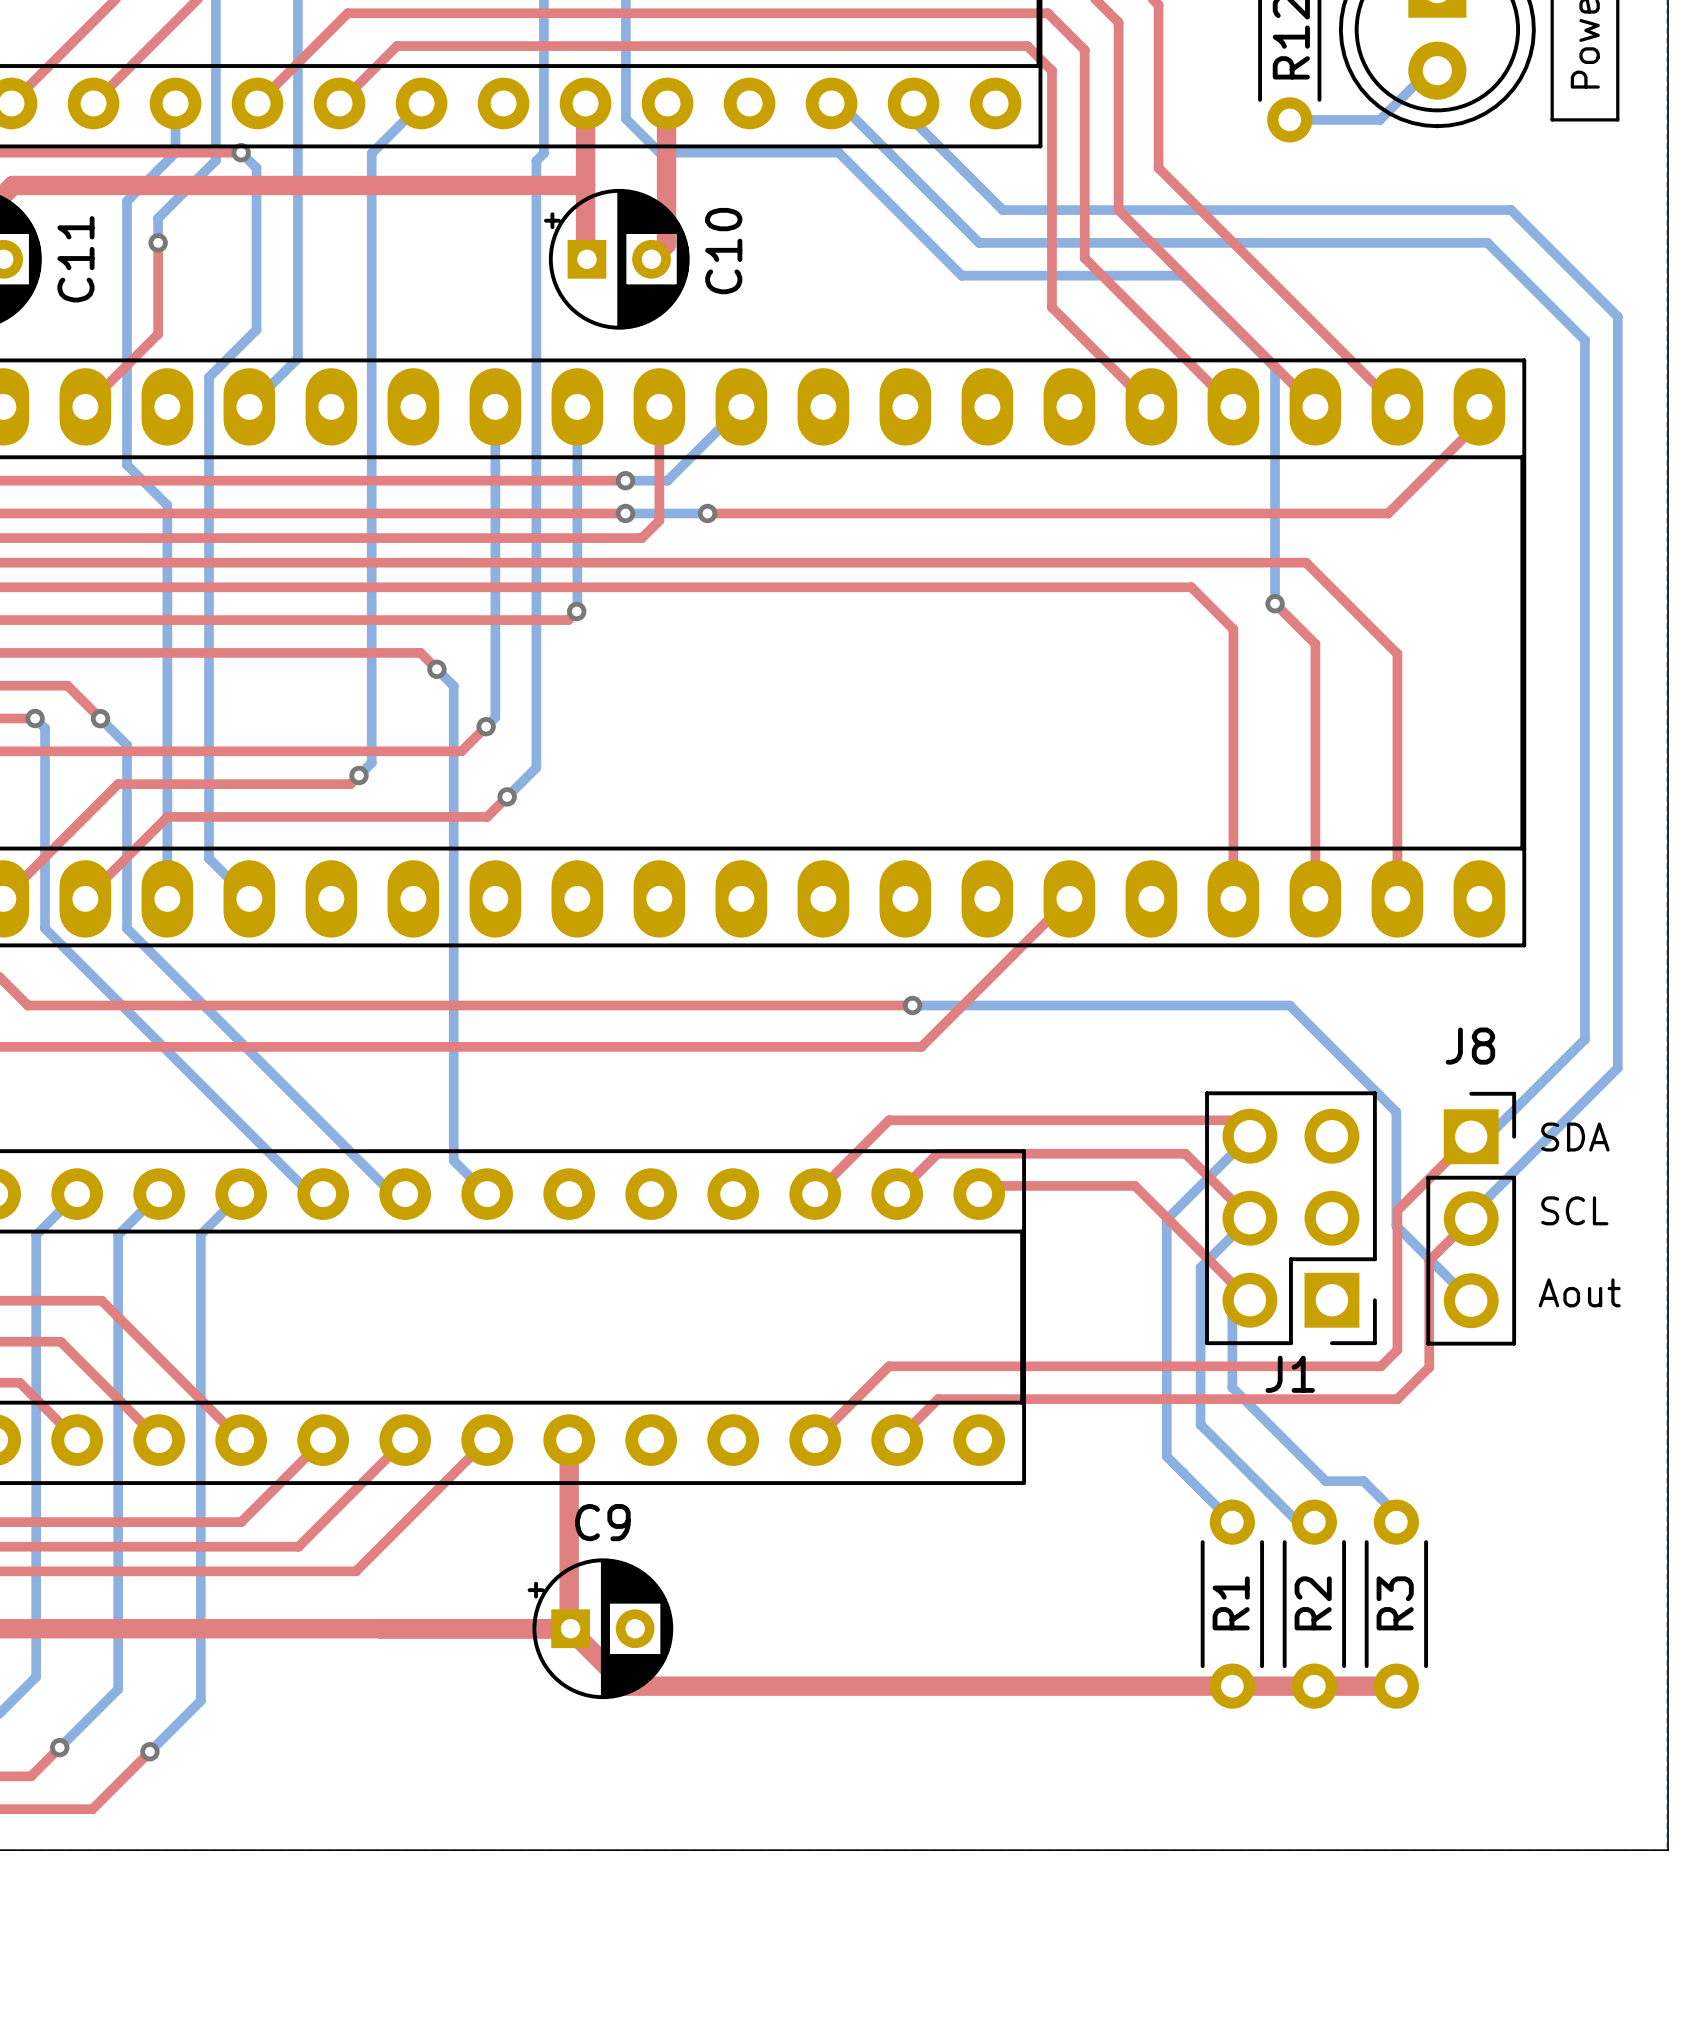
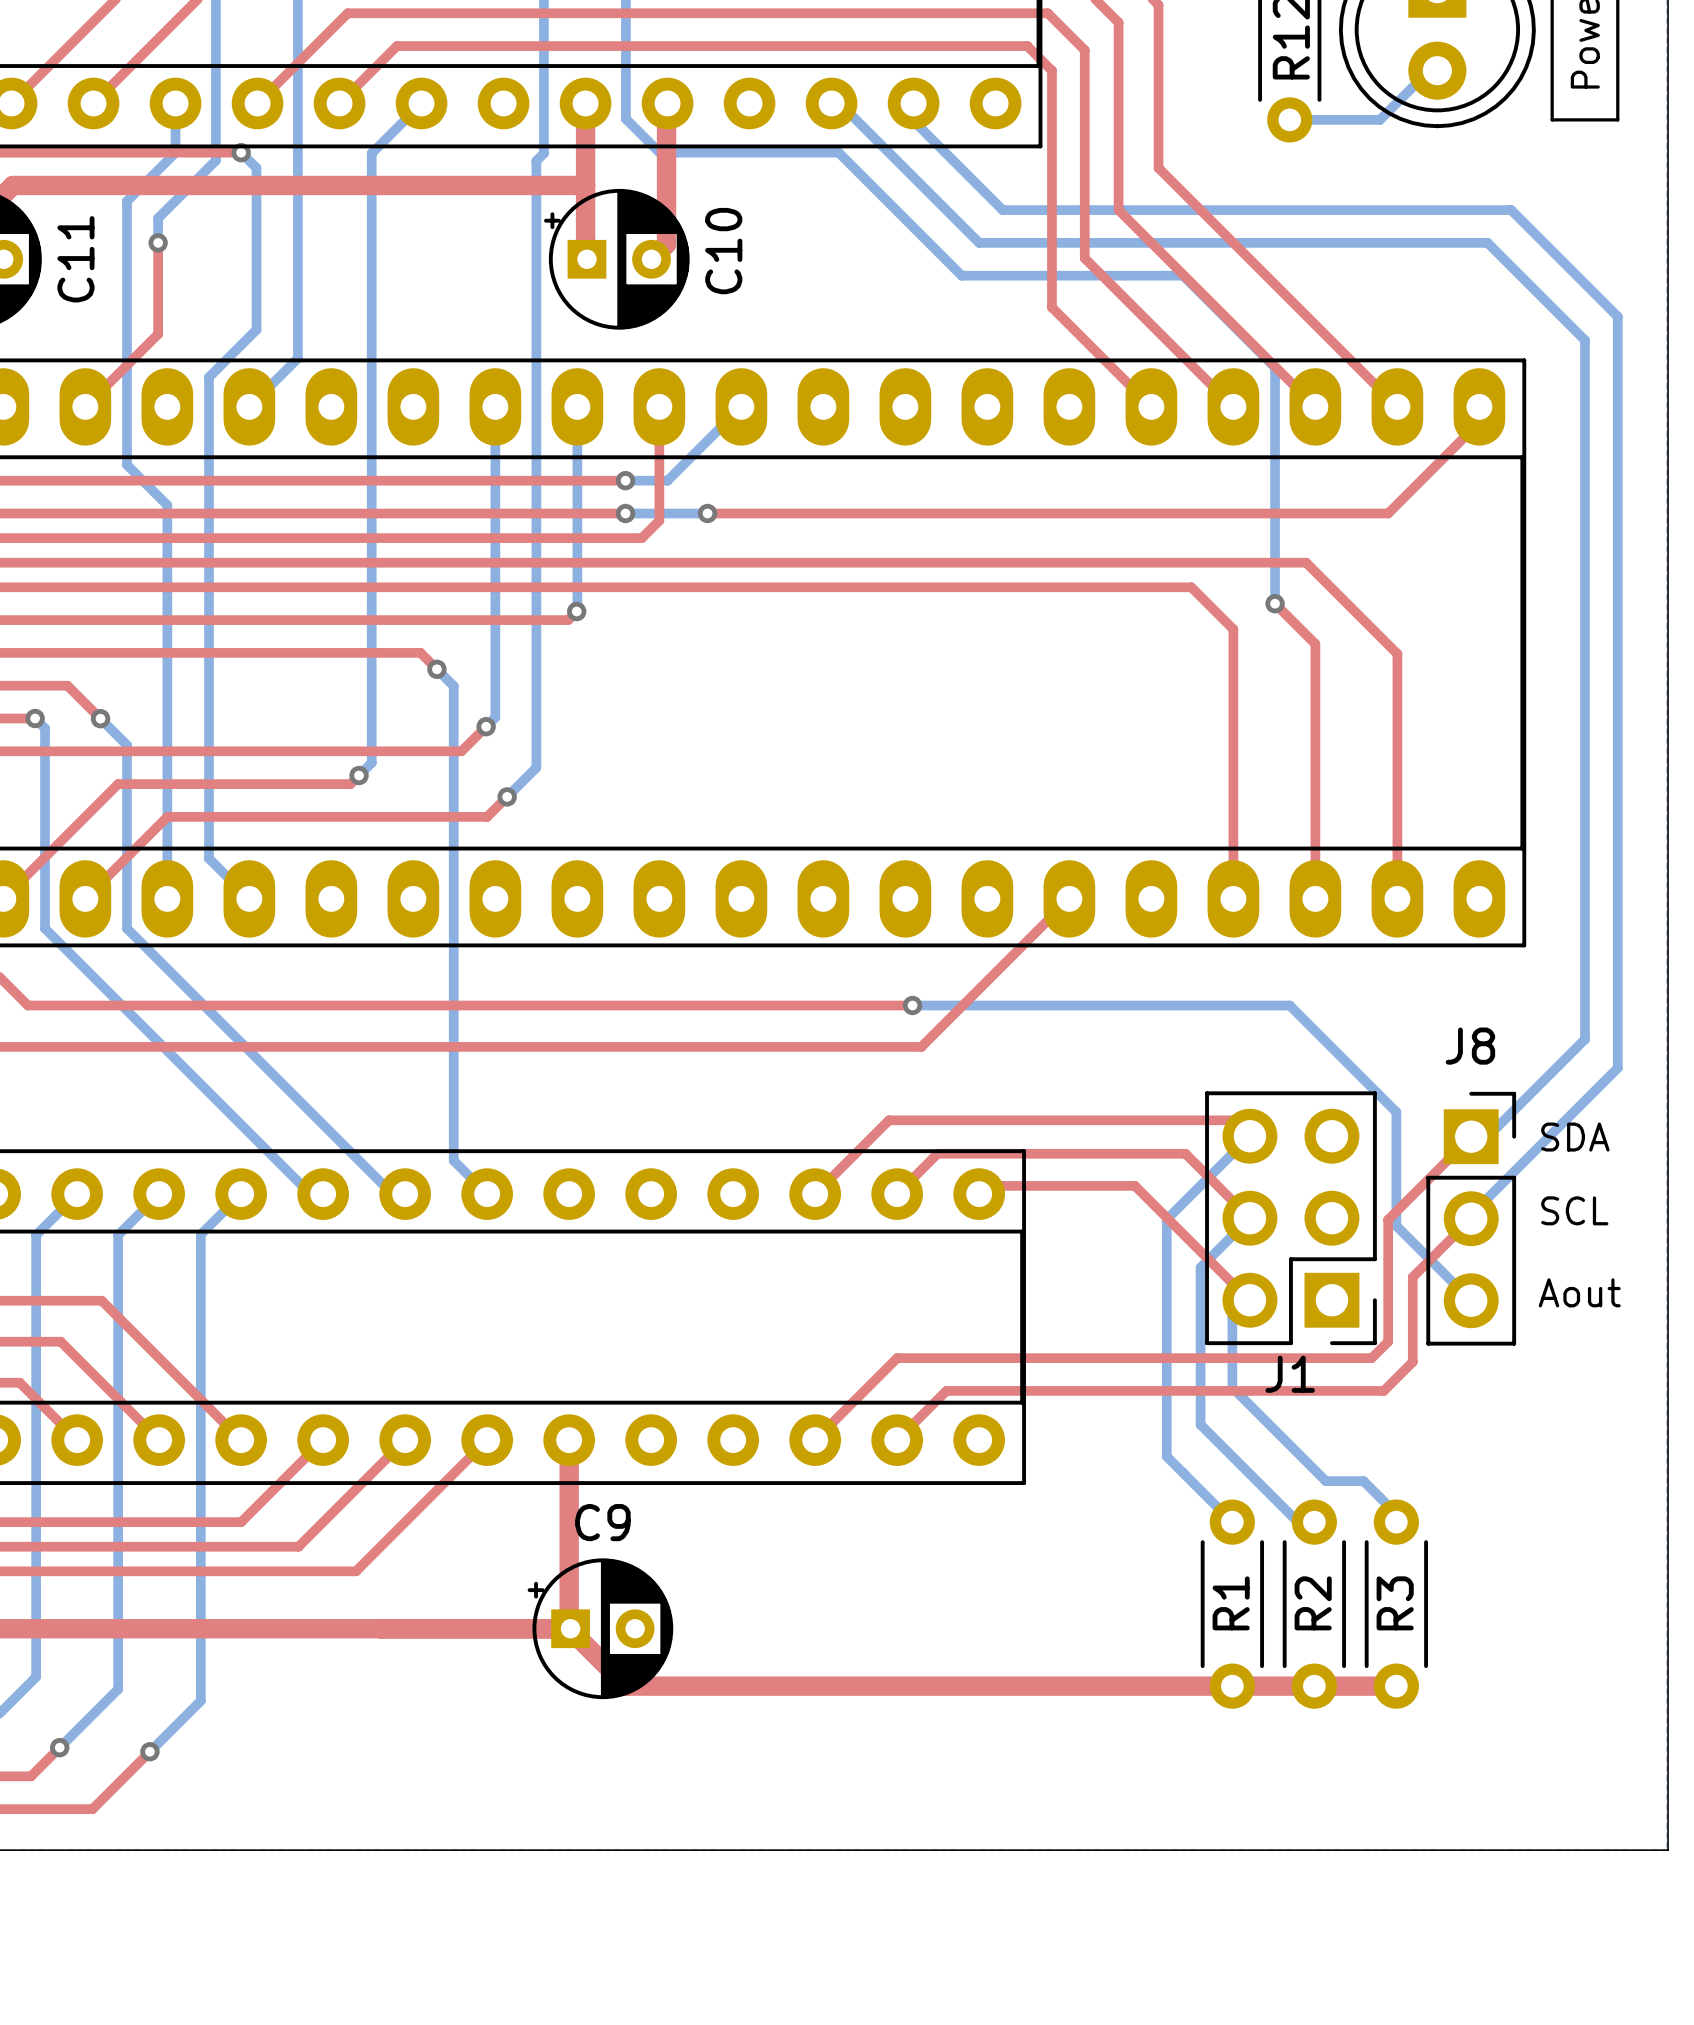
top track: (1397, 1210) (1397, 1349) (1381, 1366) (888, 1366) -> (1397, 1210) (1388, 1219) (1388, 1341) (1371, 1358) (897, 1358) (888, 1366)
top track: (1429, 1260) (1429, 1367) (1397, 1399) (938, 1399) -> (1429, 1260) (1412, 1277) (1412, 1361) (1383, 1390) (946, 1390) (938, 1399)

